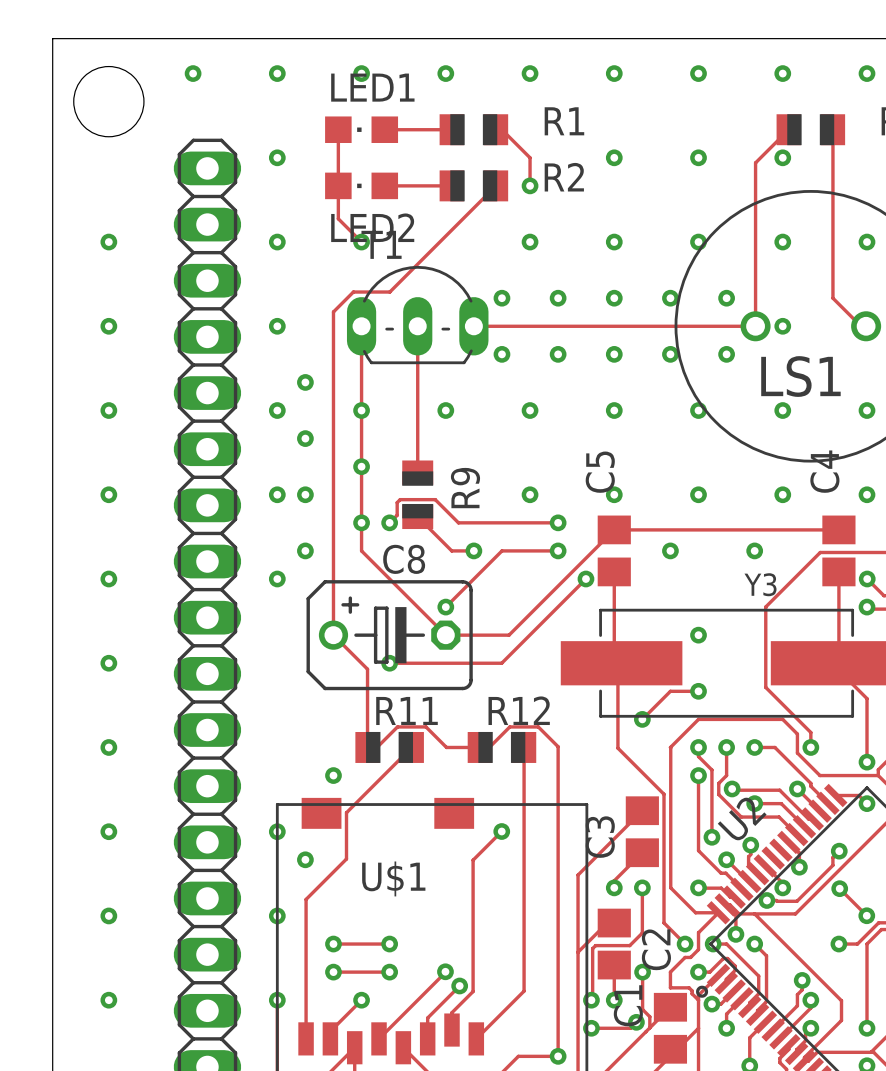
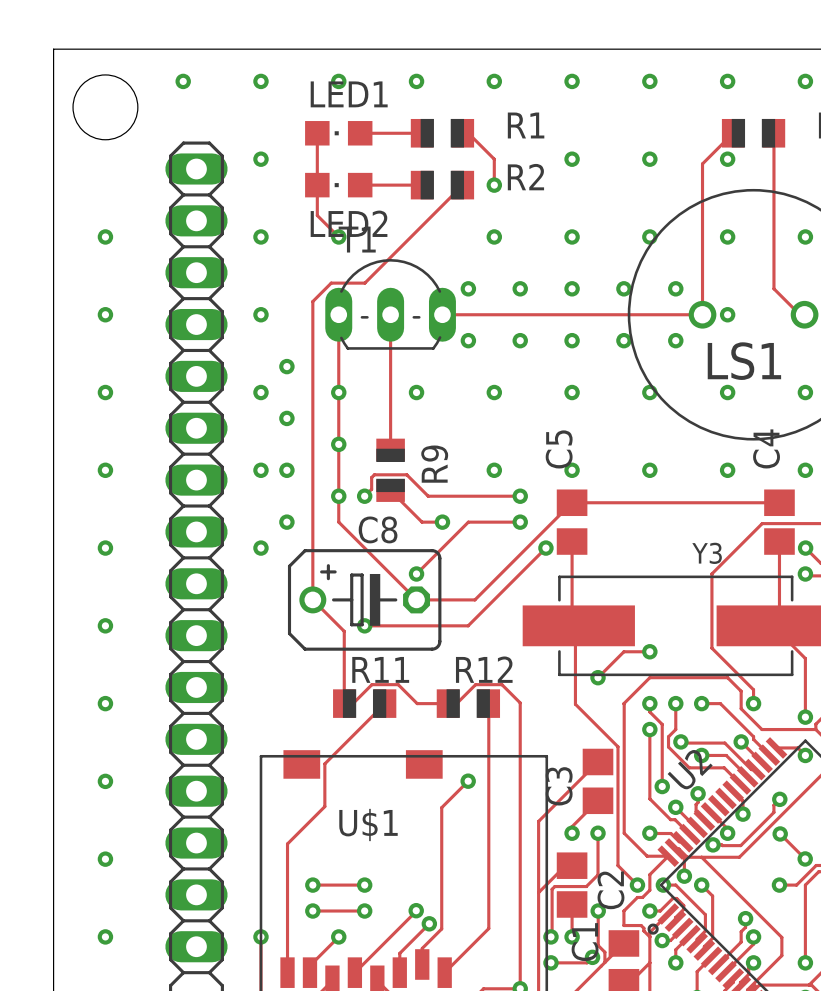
via: (670, 550) -> none
via: (754, 550) -> none
via: (698, 635) -> none
via: (333, 775) -> none
via: (277, 831) -> none
via: (305, 859) -> none
via: (277, 915) -> none

